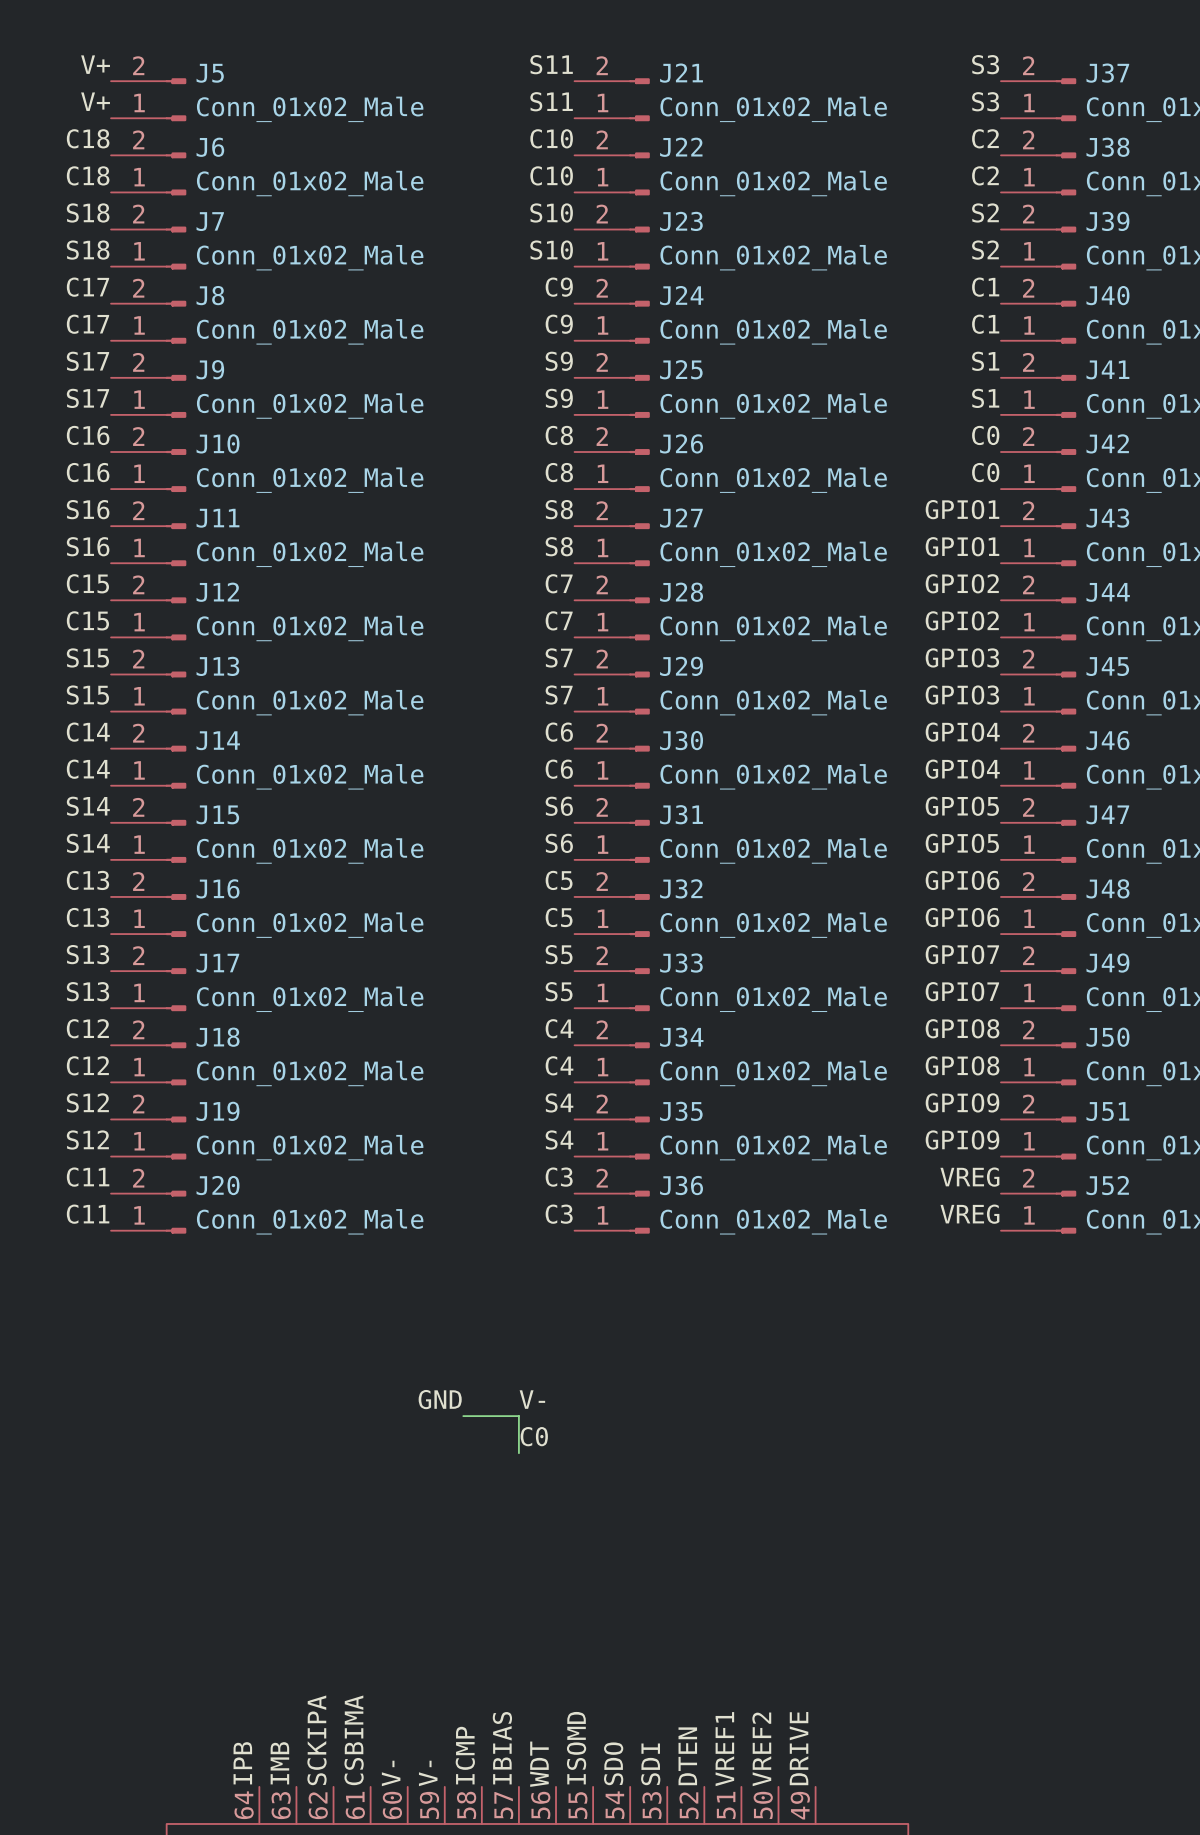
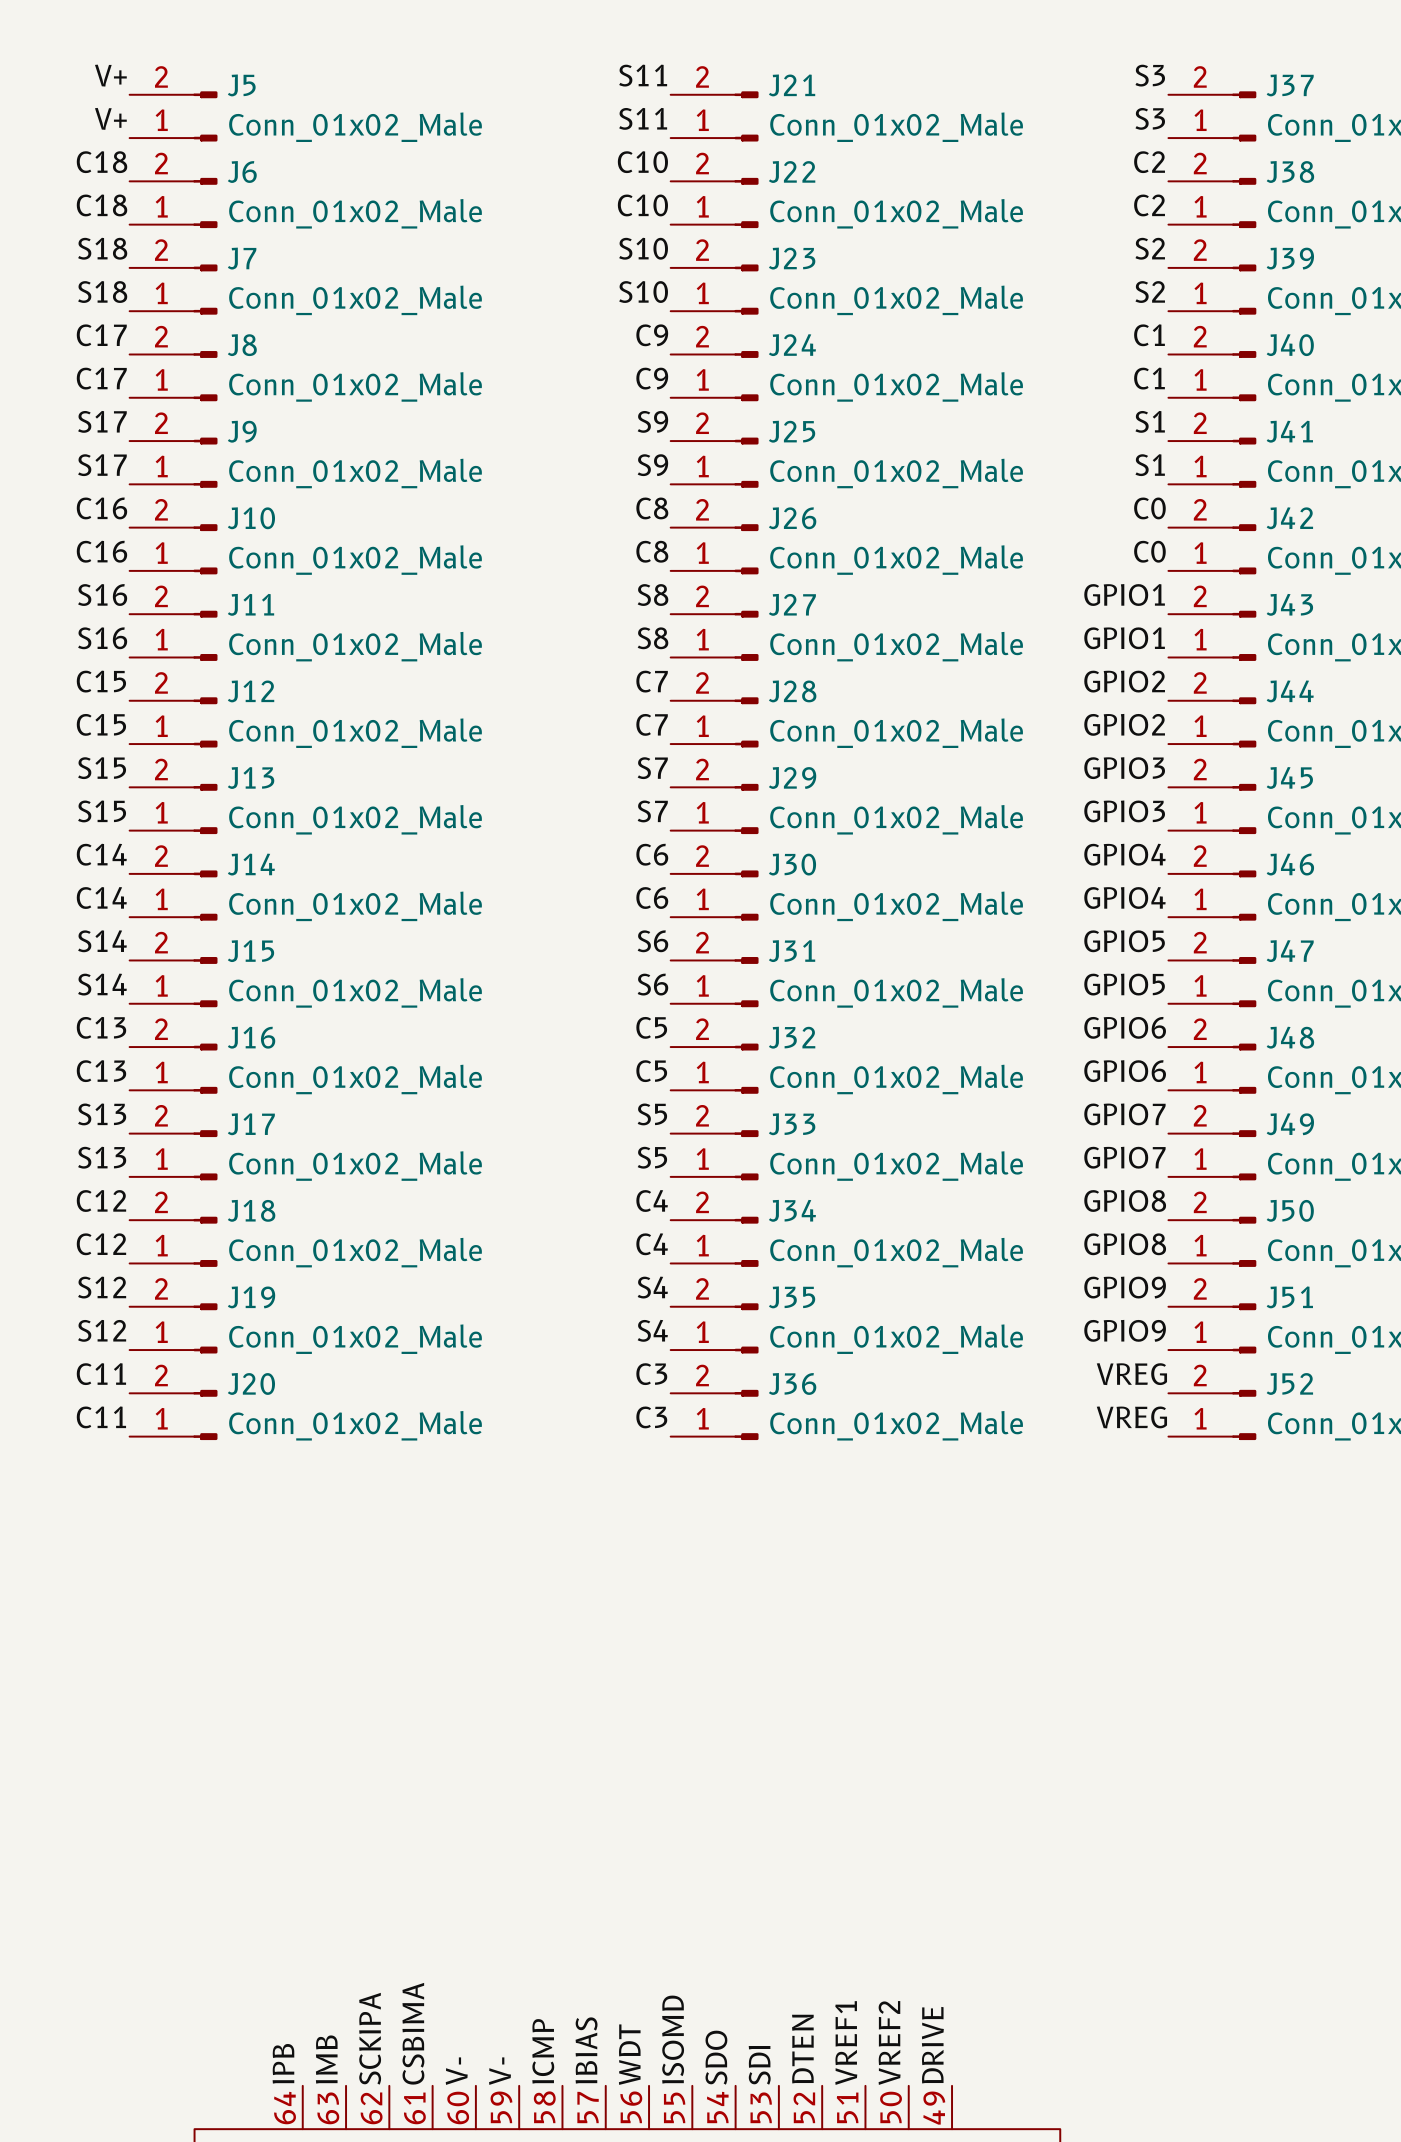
label: GND (440, 1399) -> none
label: V- (532, 1399) -> none
wire: (463, 1416) (518, 1416) (518, 1453) -> none
label: C0 (534, 1436) -> none

